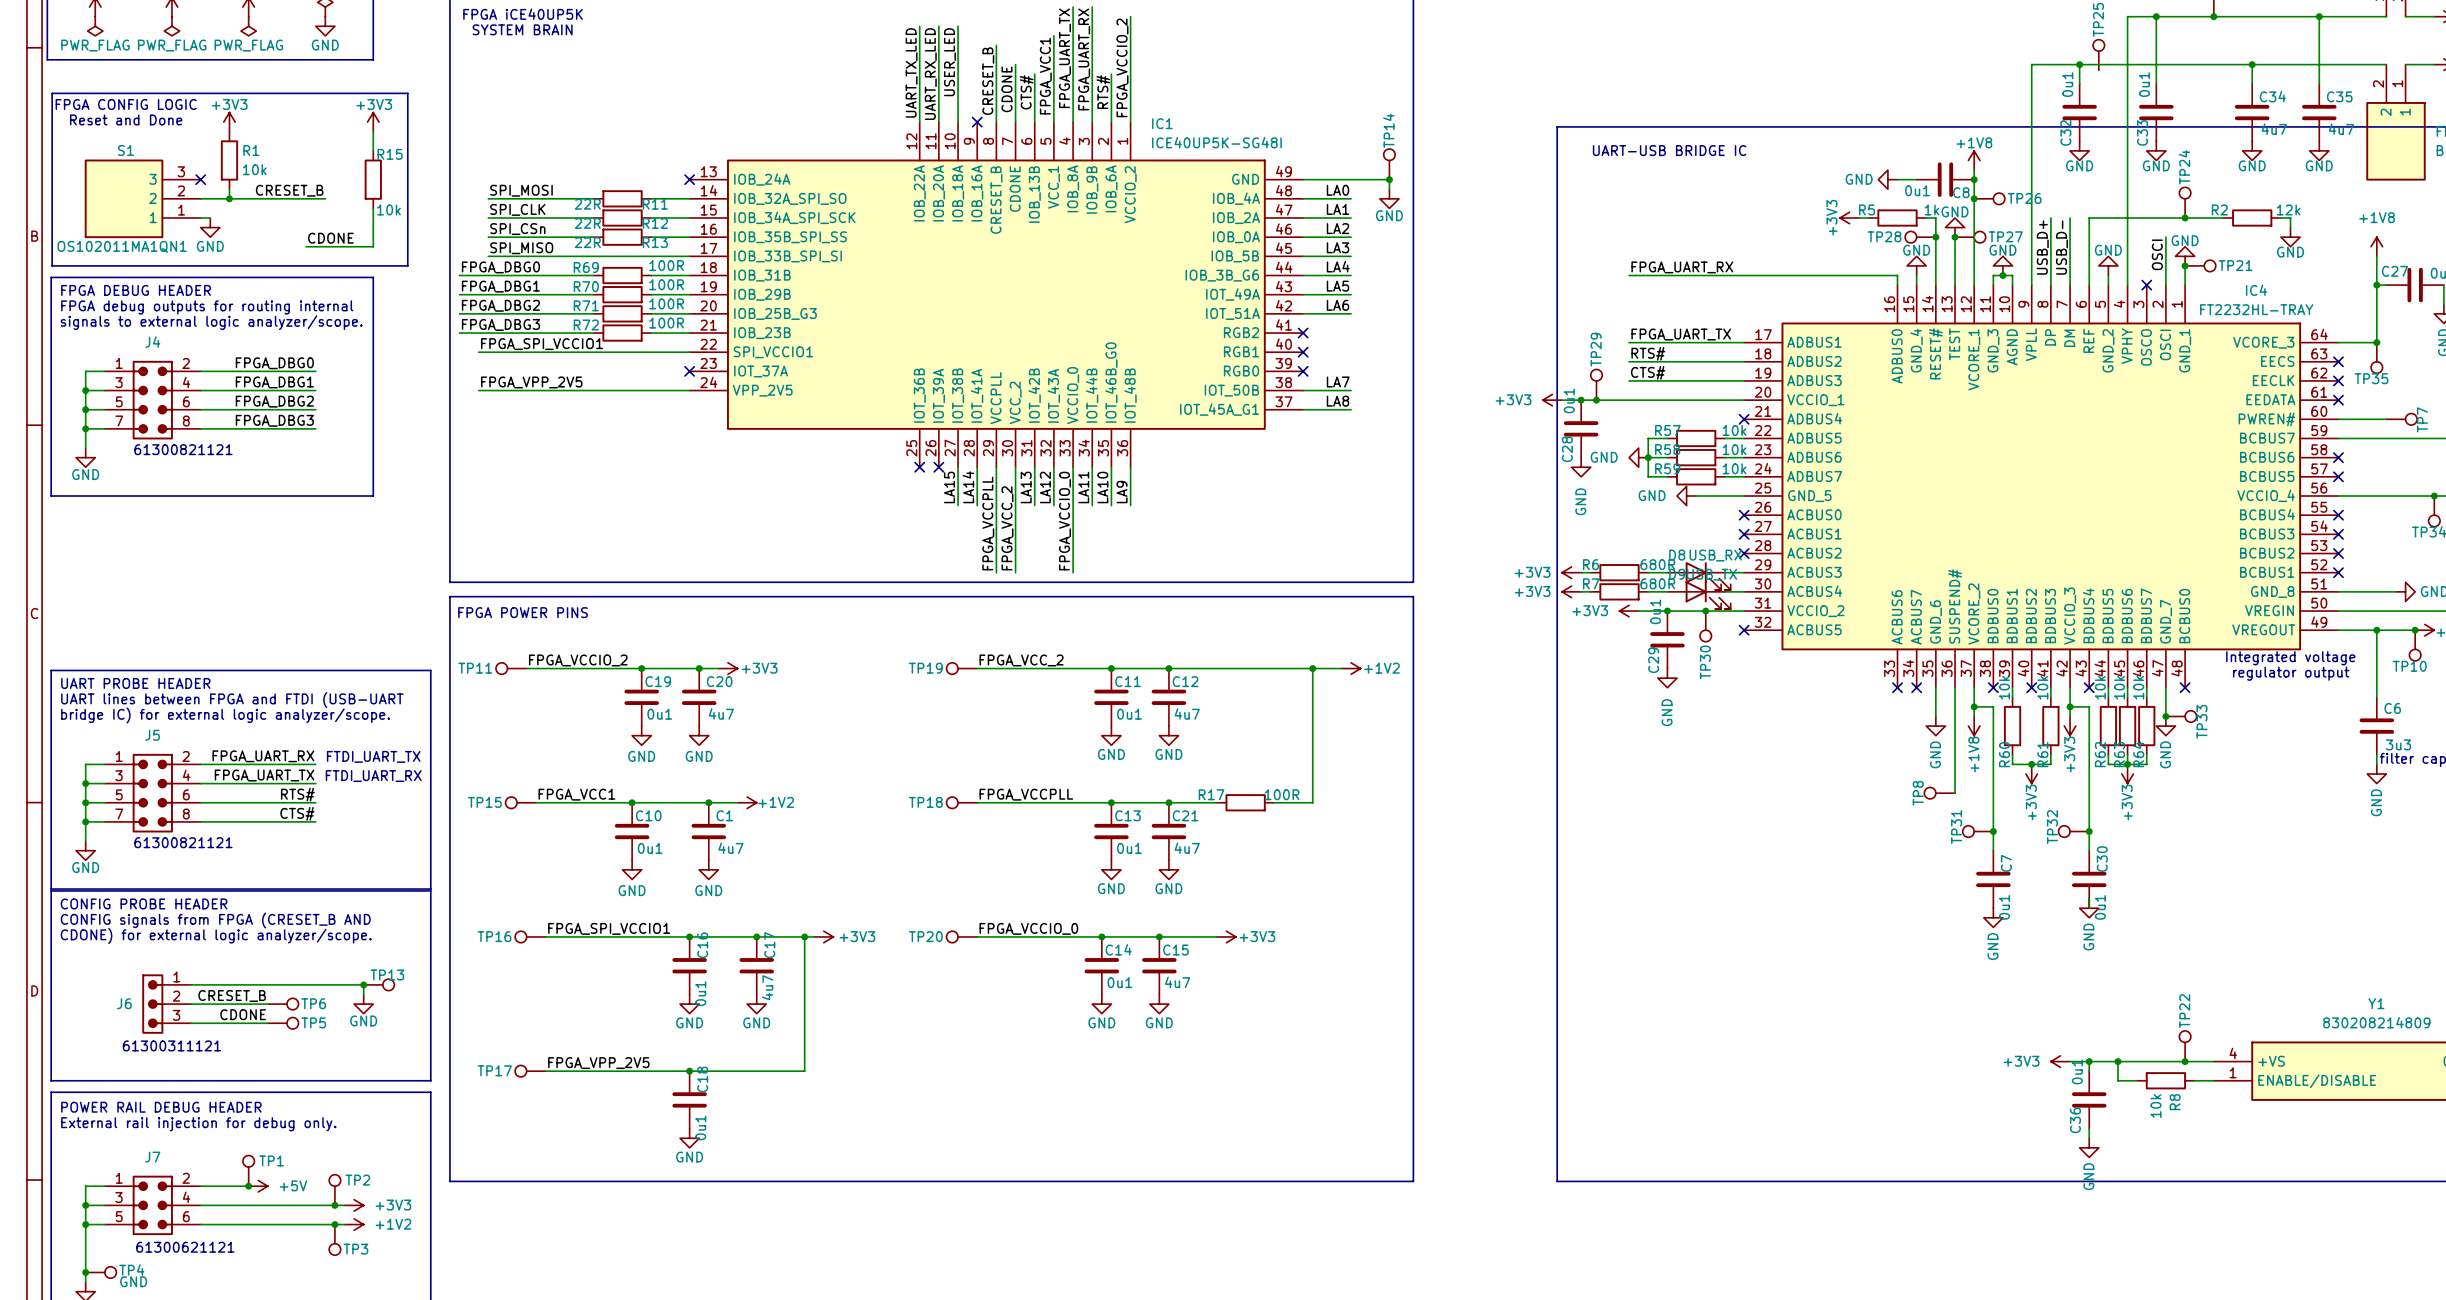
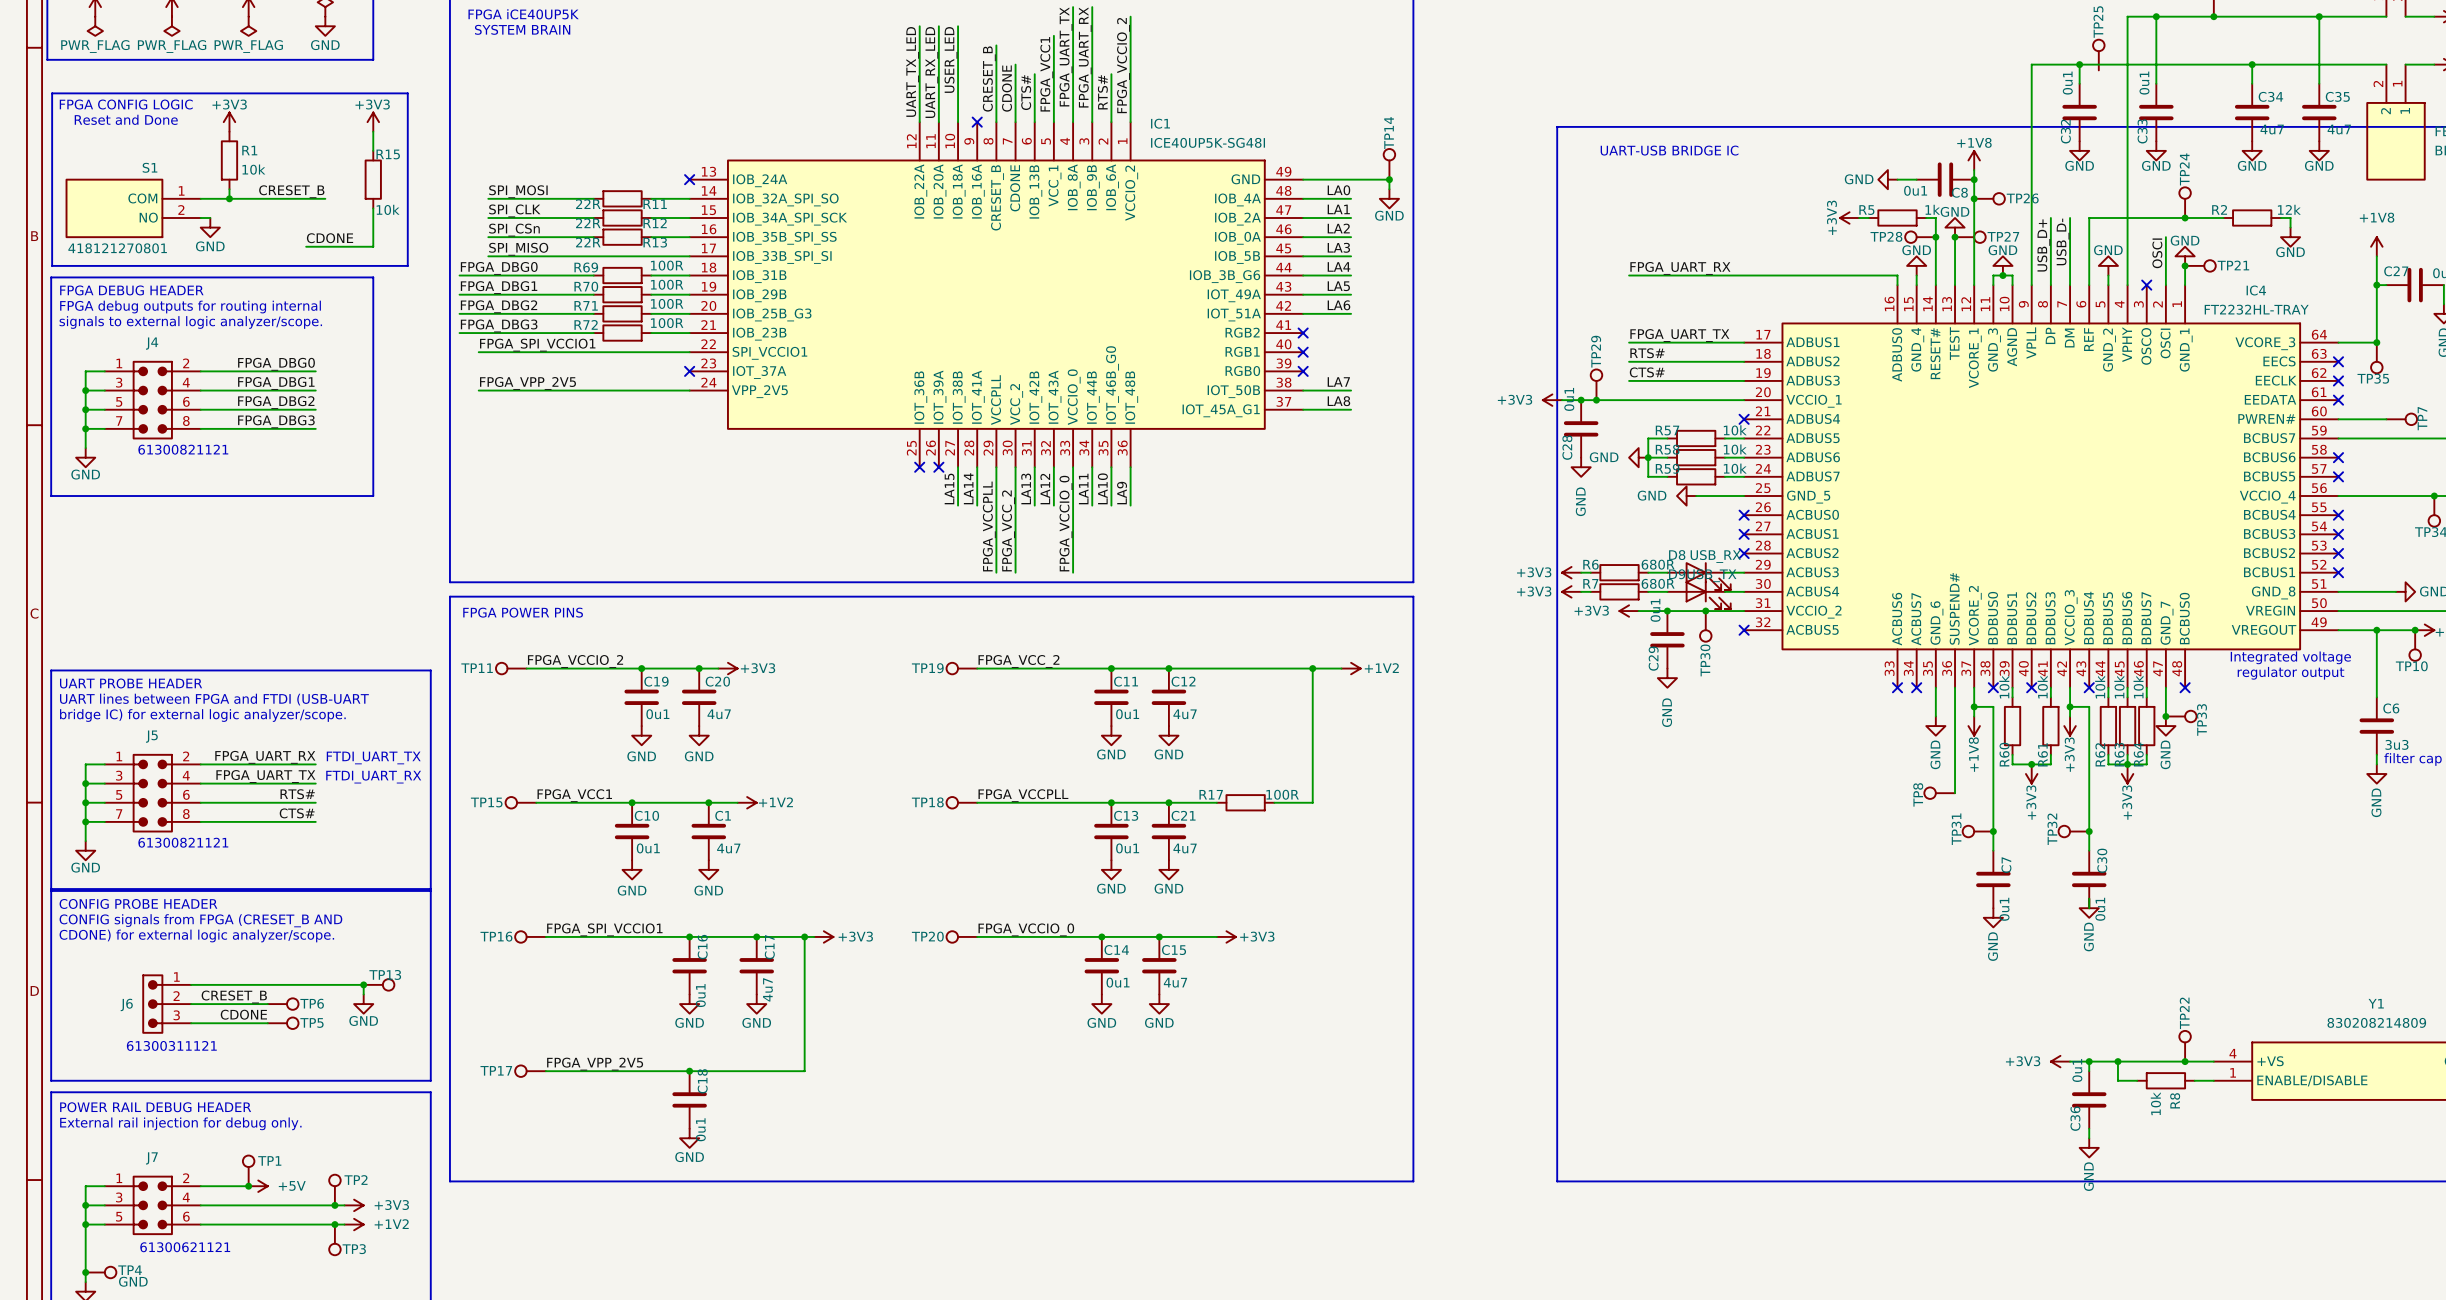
S1 name position: S1 (125, 150) -> S1 (150, 167)
S1 symbol: [84, 159, 201, 239] -> [65, 178, 201, 239]
no-connect mark: (200, 179) -> none
S1 value: OS102011MA1QN1 (122, 246) -> 418121270801 (117, 248)

